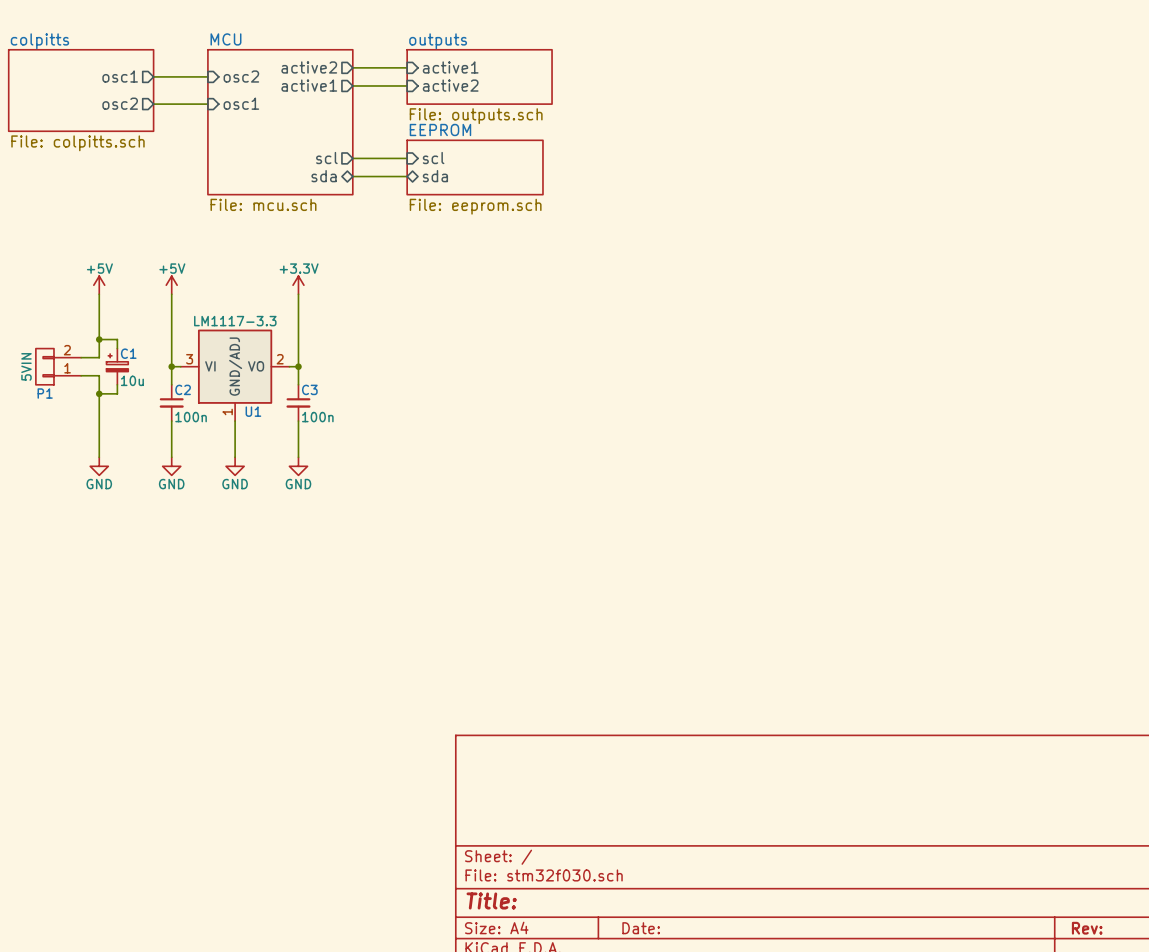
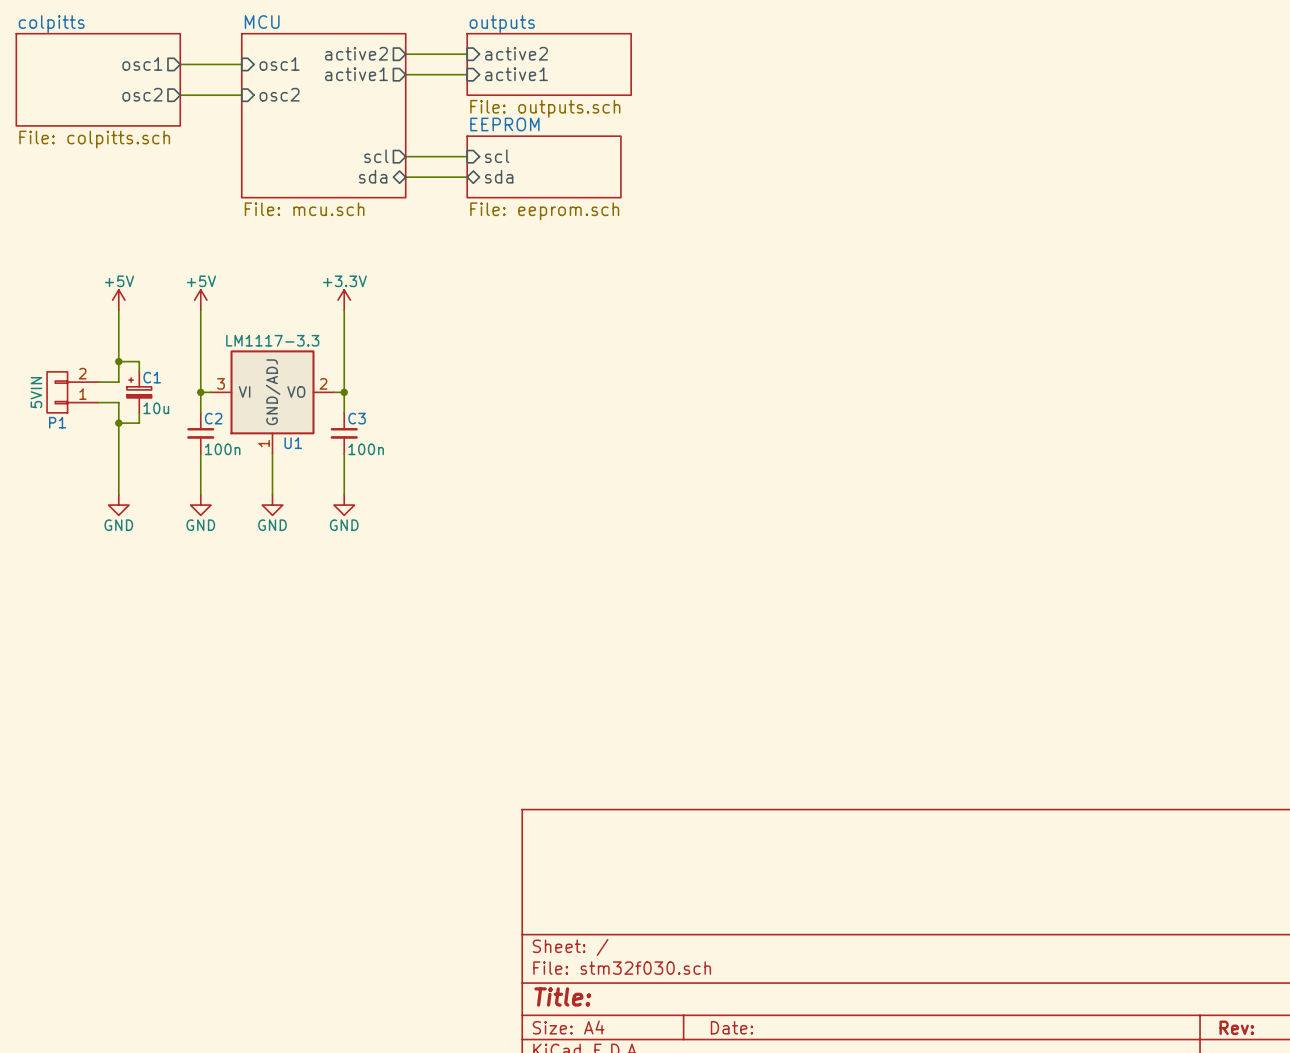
sheet pin: active1 (450, 67) -> active2 (516, 53)
sheet pin: osc2 (241, 76) -> osc1 (279, 63)
sheet pin: active2 (450, 85) -> active1 (516, 74)
sheet pin: osc1 (241, 103) -> osc2 (279, 94)

